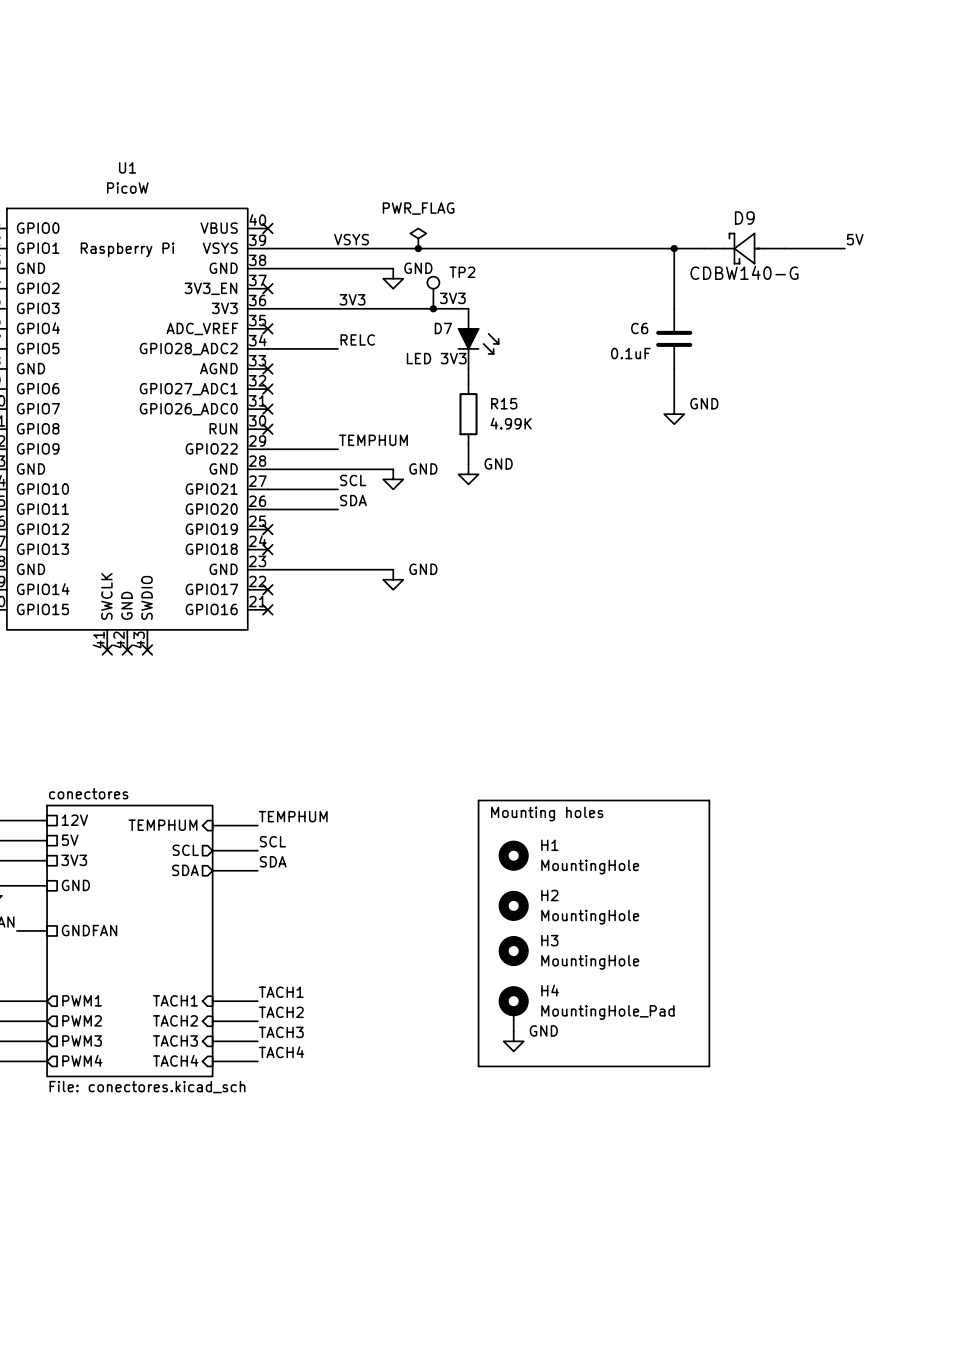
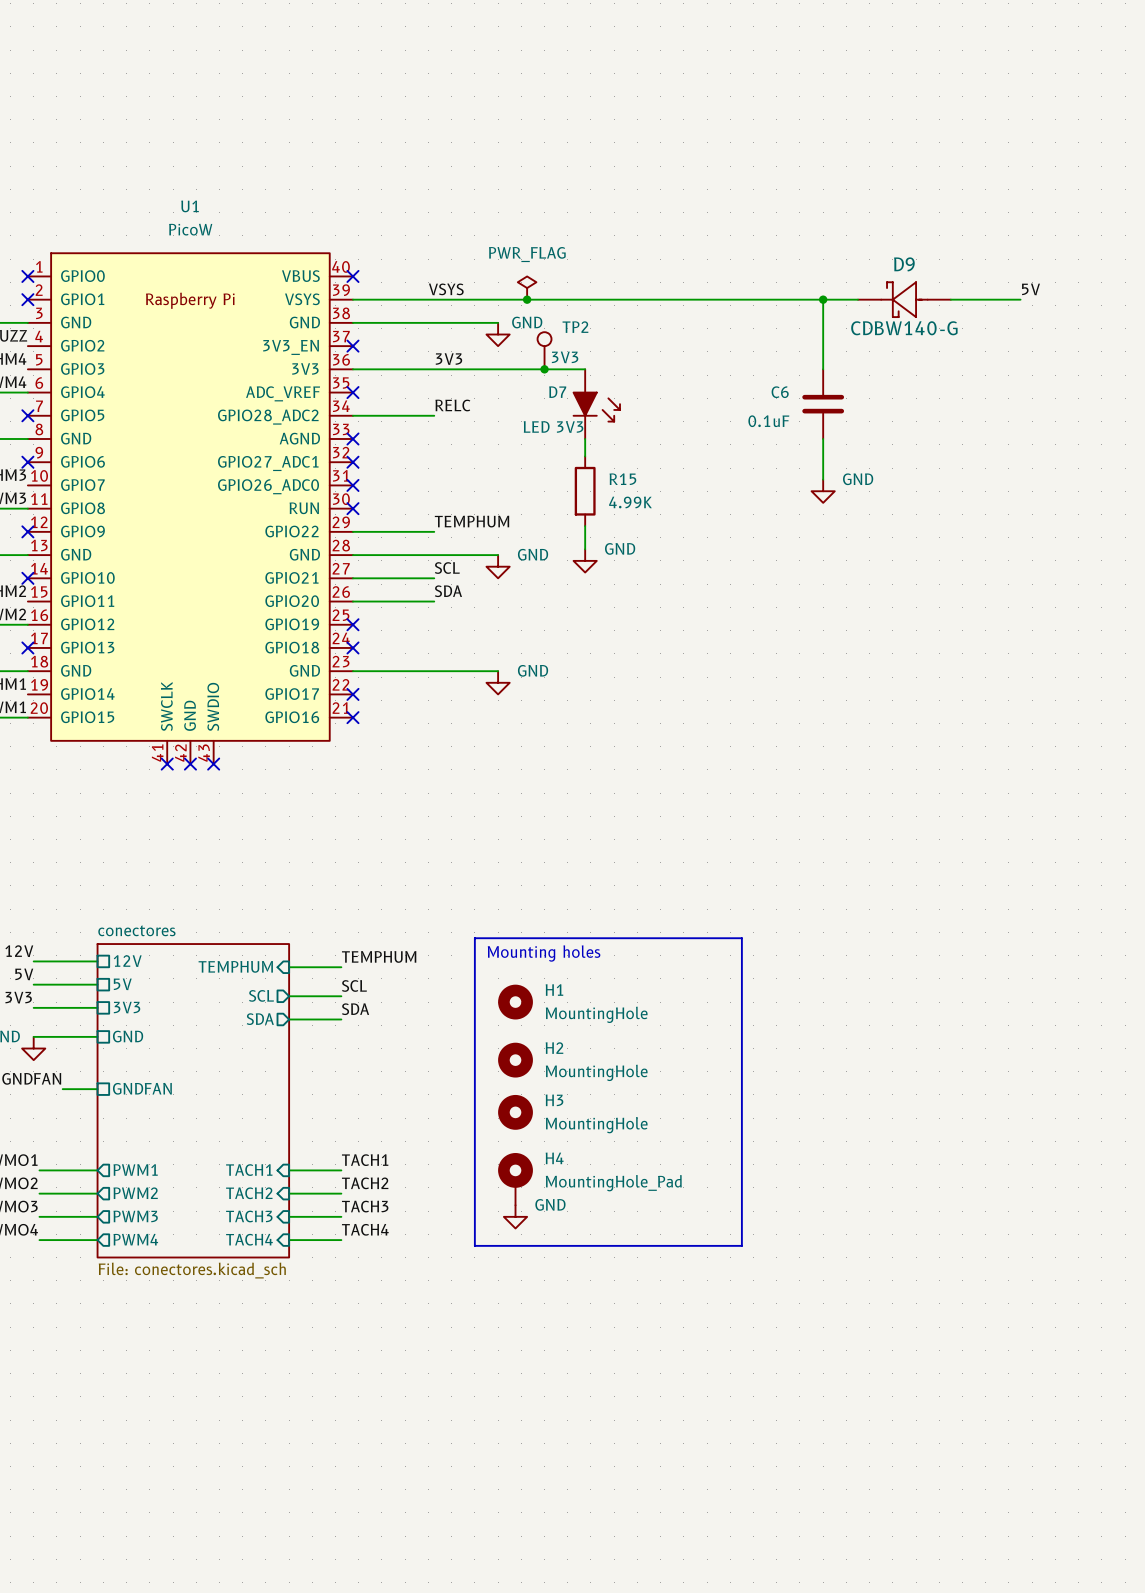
line: (478, 800) (478, 1066) -> (596, 938) (474, 938) (474, 1245) (596, 1245)
line: (604, 800) (709, 800) (709, 1066) (604, 1066) -> (741, 938) (741, 1245)
text position: Mounting holes (547, 814) -> Mounting holes (544, 953)
H1 position: (513, 855) -> (515, 1002)
H2 position: (513, 905) -> (515, 1060)
H3 position: (513, 951) -> (515, 1112)
H4 position: (513, 1008) -> (515, 1179)
power symbol position: GND (513, 1041) -> GND (515, 1216)

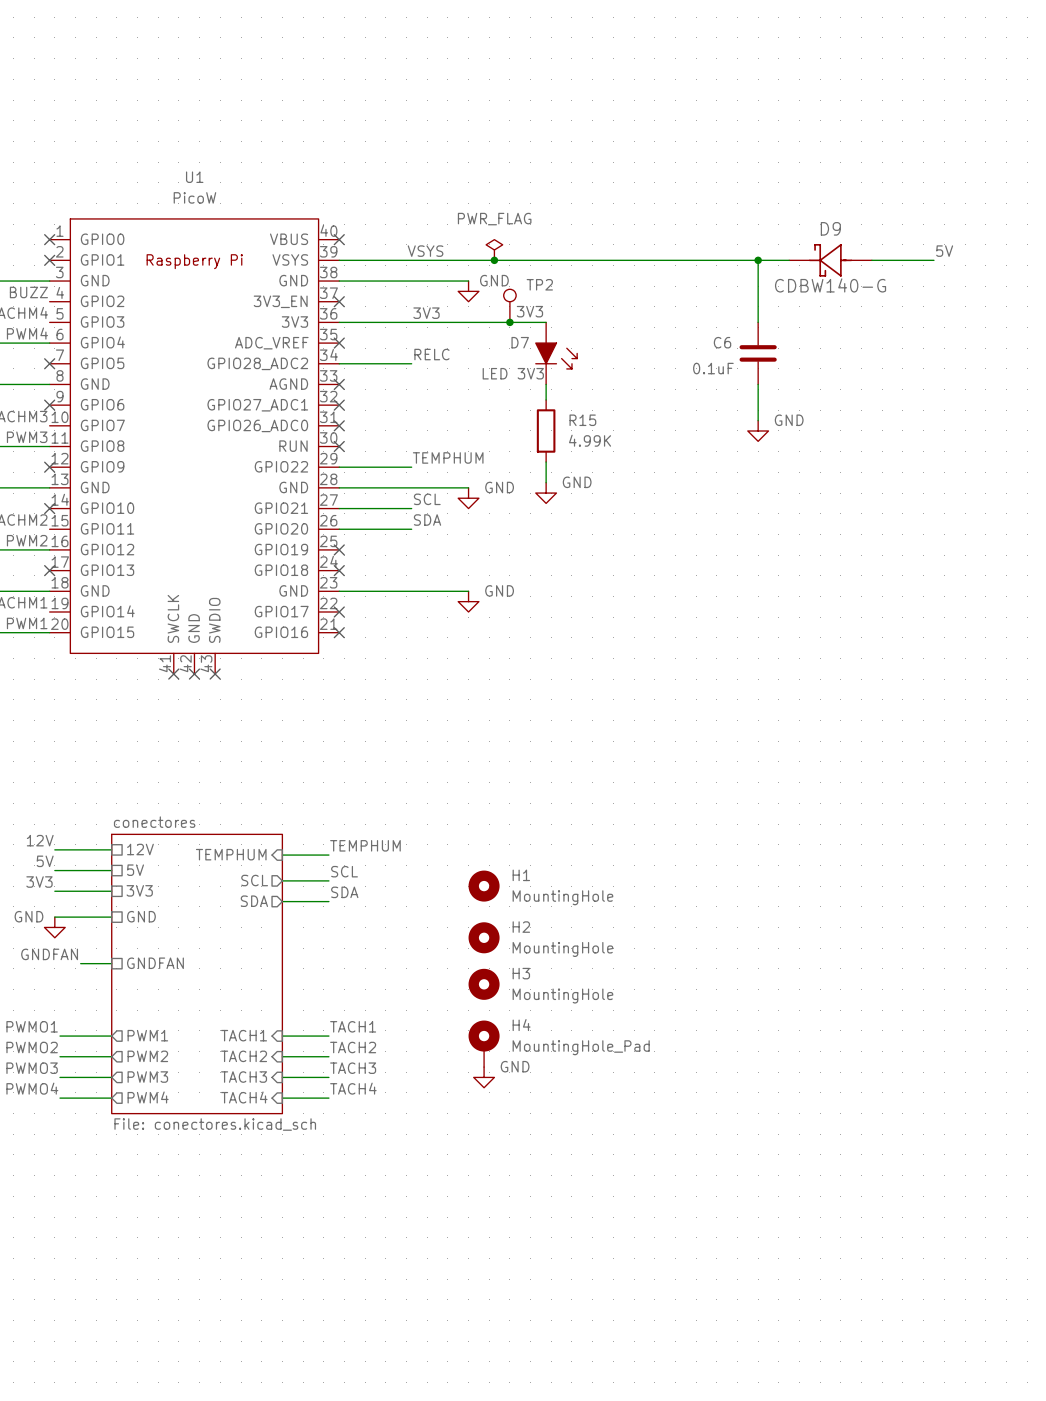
line: (474, 938) (474, 1245) (741, 1245) (741, 938) (474, 938) -> none
text: Mounting holes (544, 953) -> none

